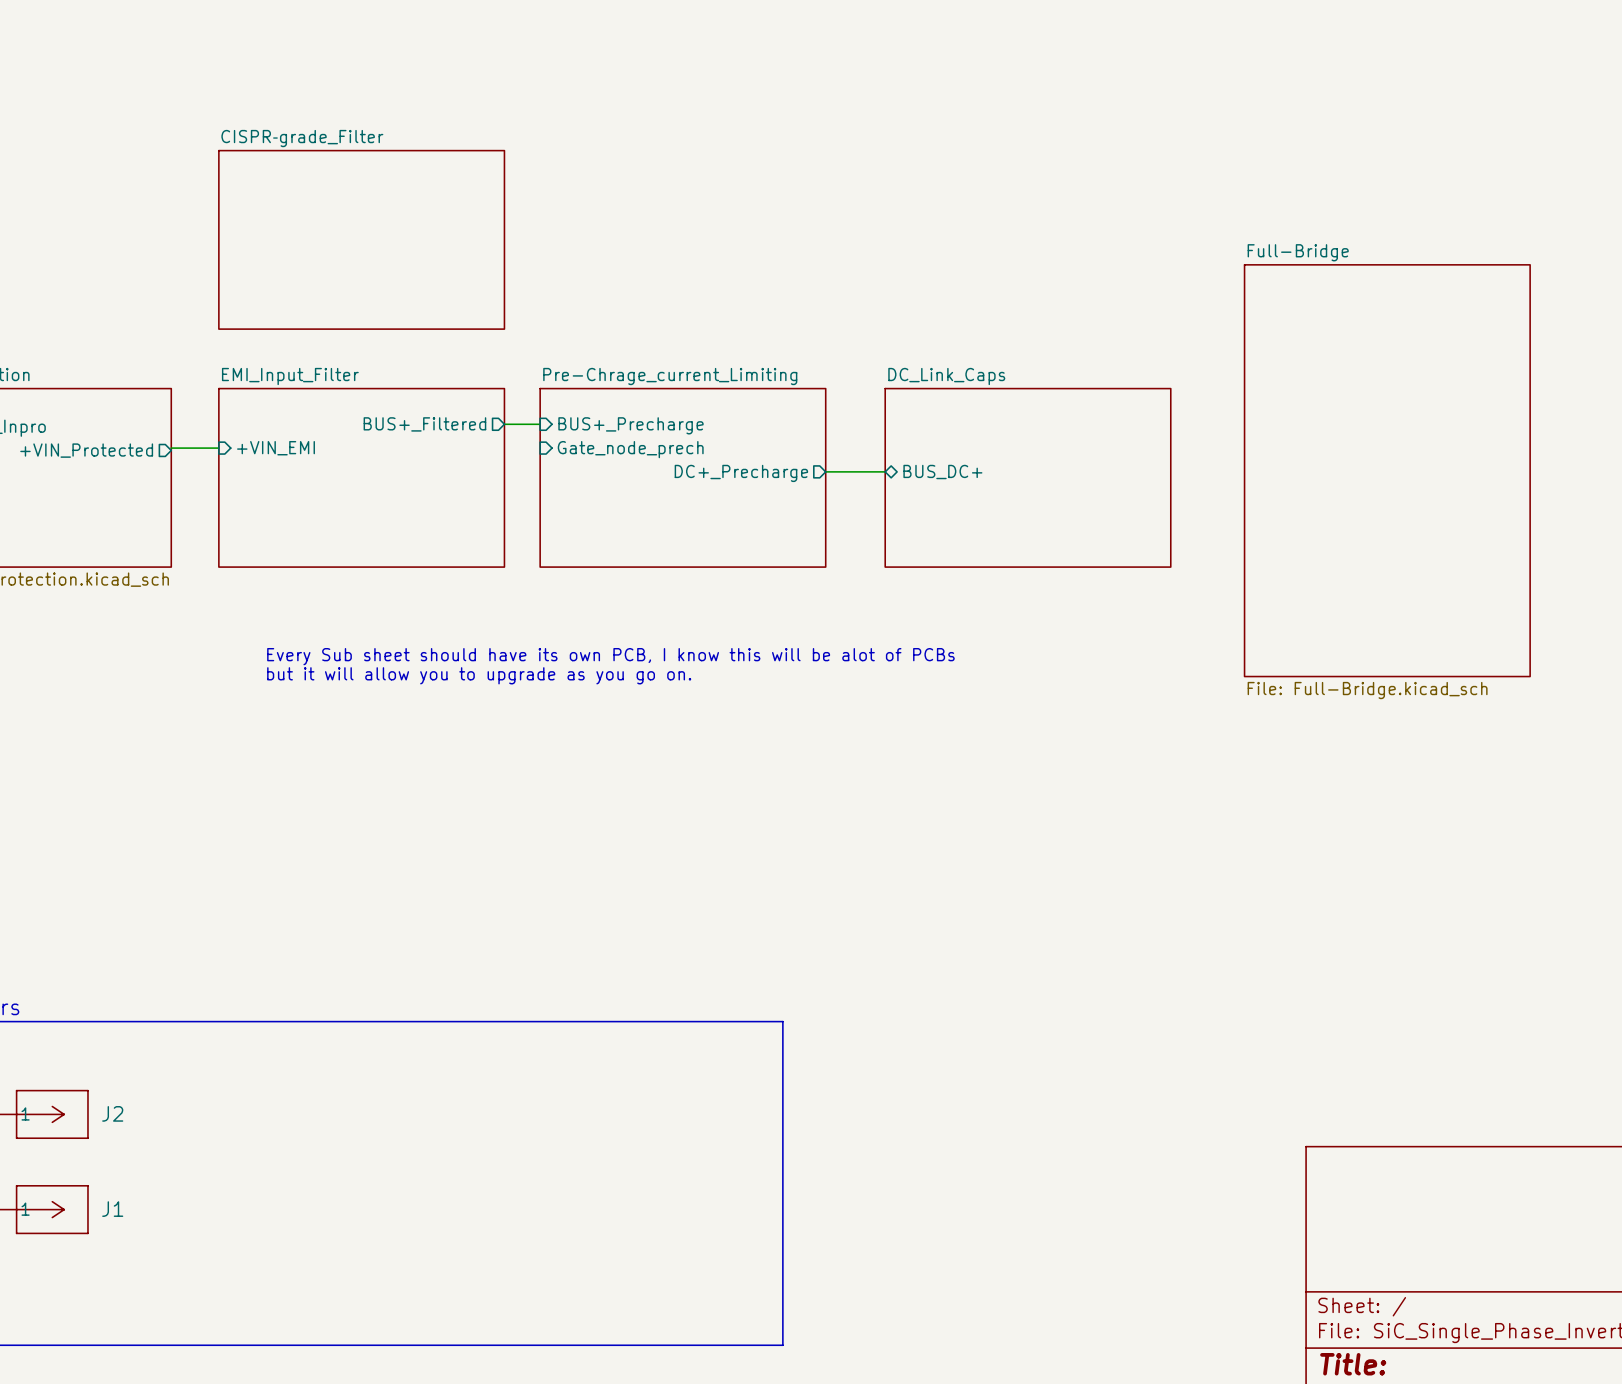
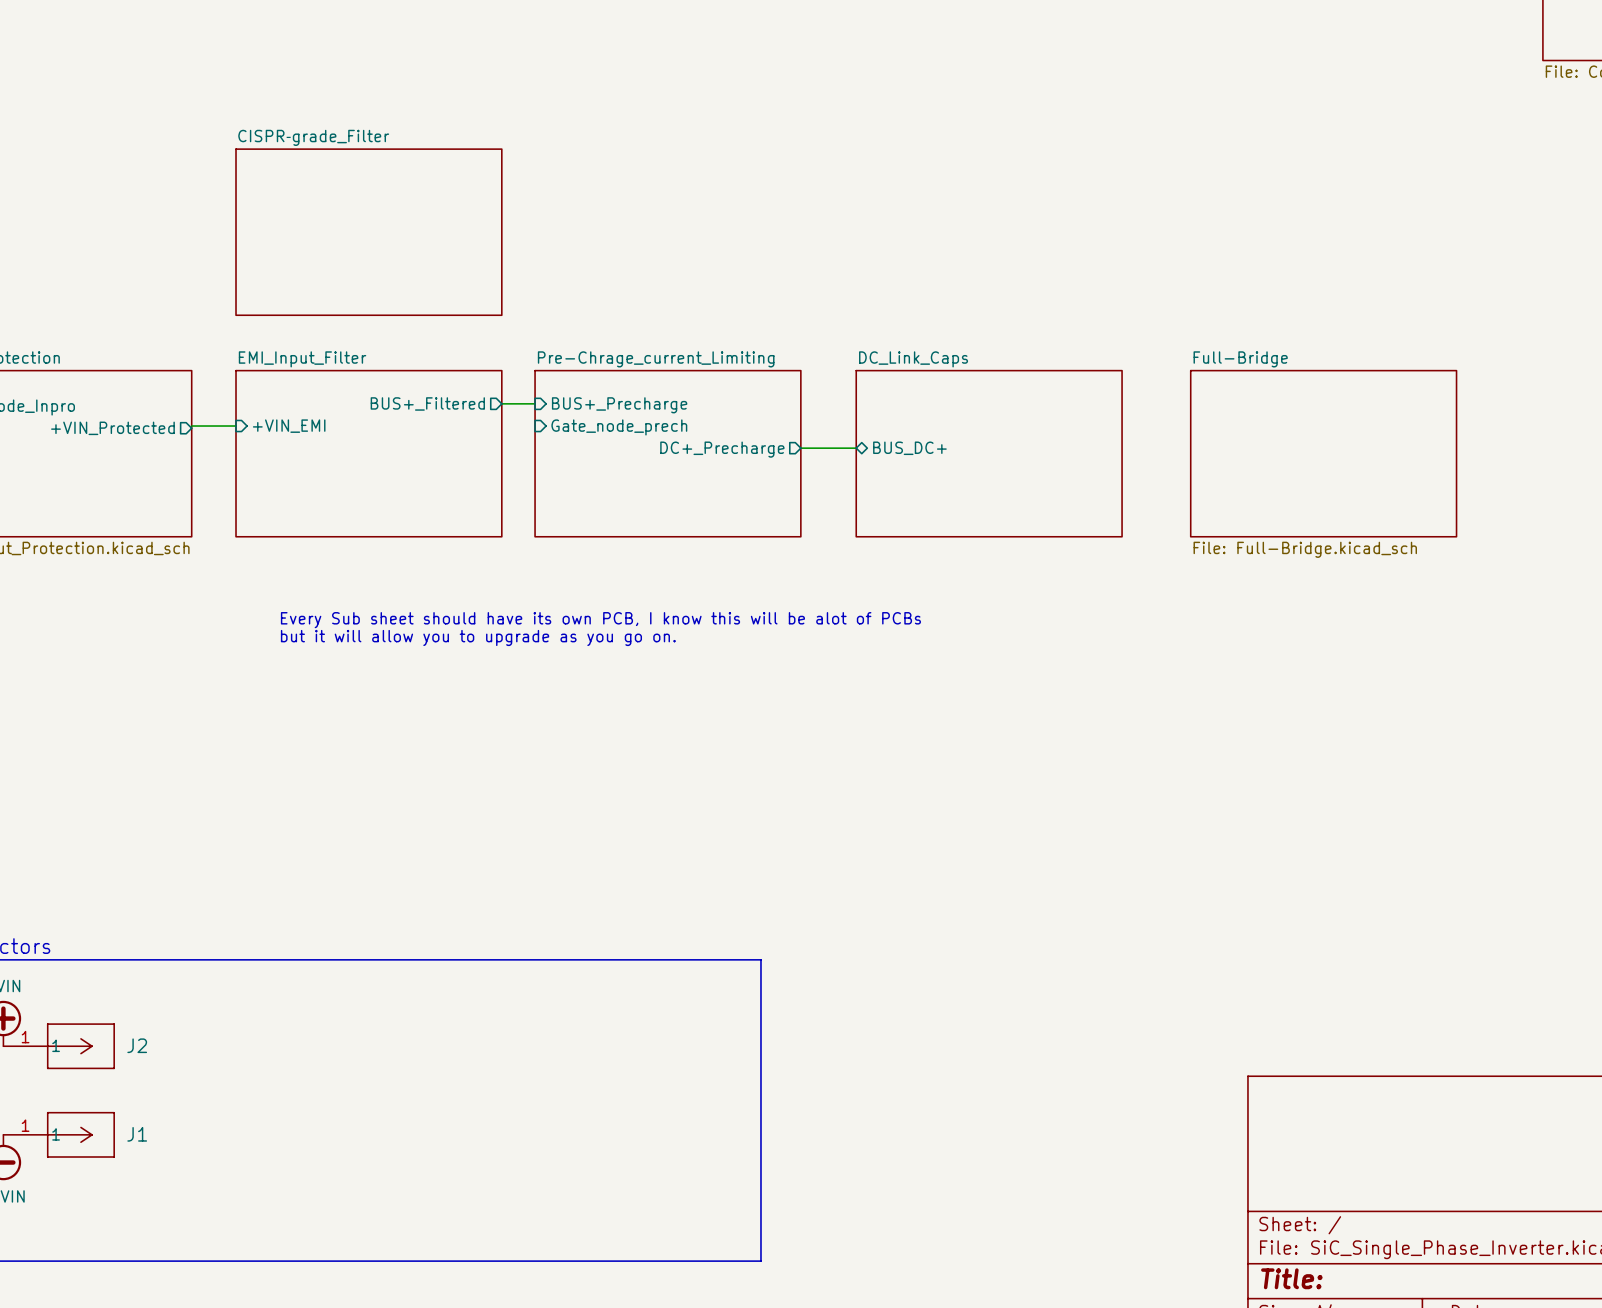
sheet Full-Bridge name position: Full-Bridge (1298, 252) -> Full-Bridge (1240, 359)
sheet Full-Bridge shape: [1243, 264, 1531, 678] -> [1190, 369, 1458, 538]
sheet Full-Bridge value position: File: Full-Bridge.kicad_sch (1367, 690) -> File: Full-Bridge.kicad_sch (1305, 549)

